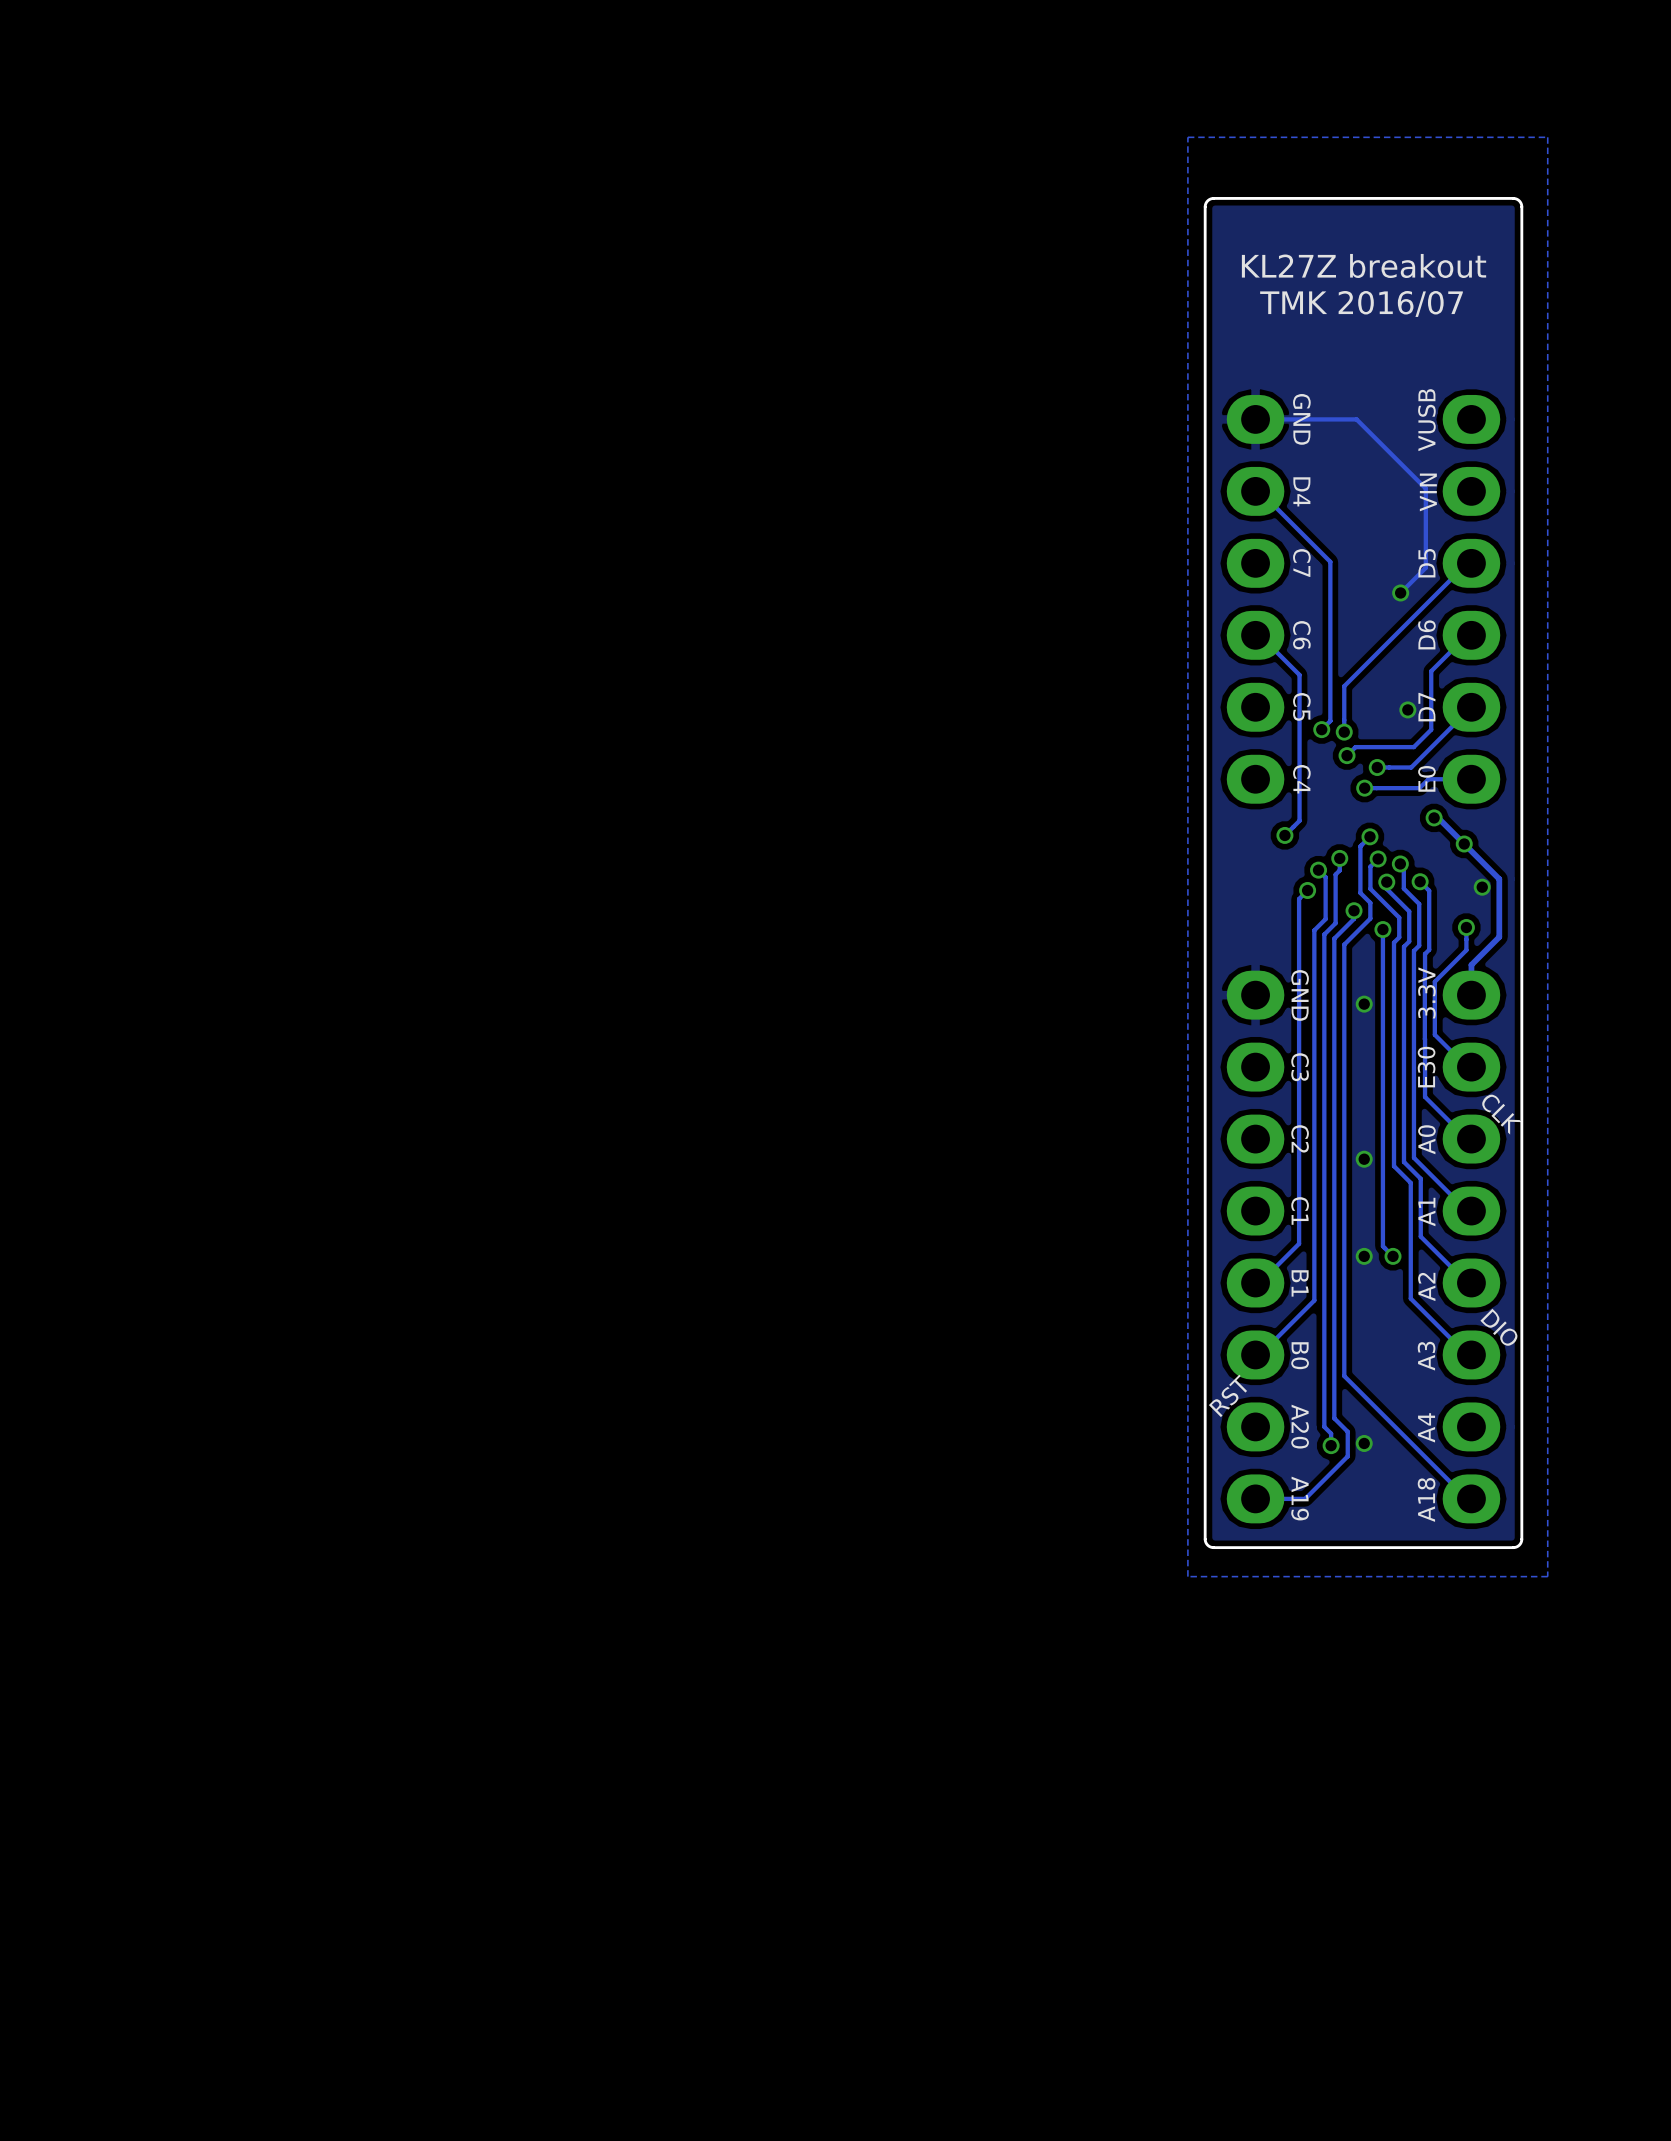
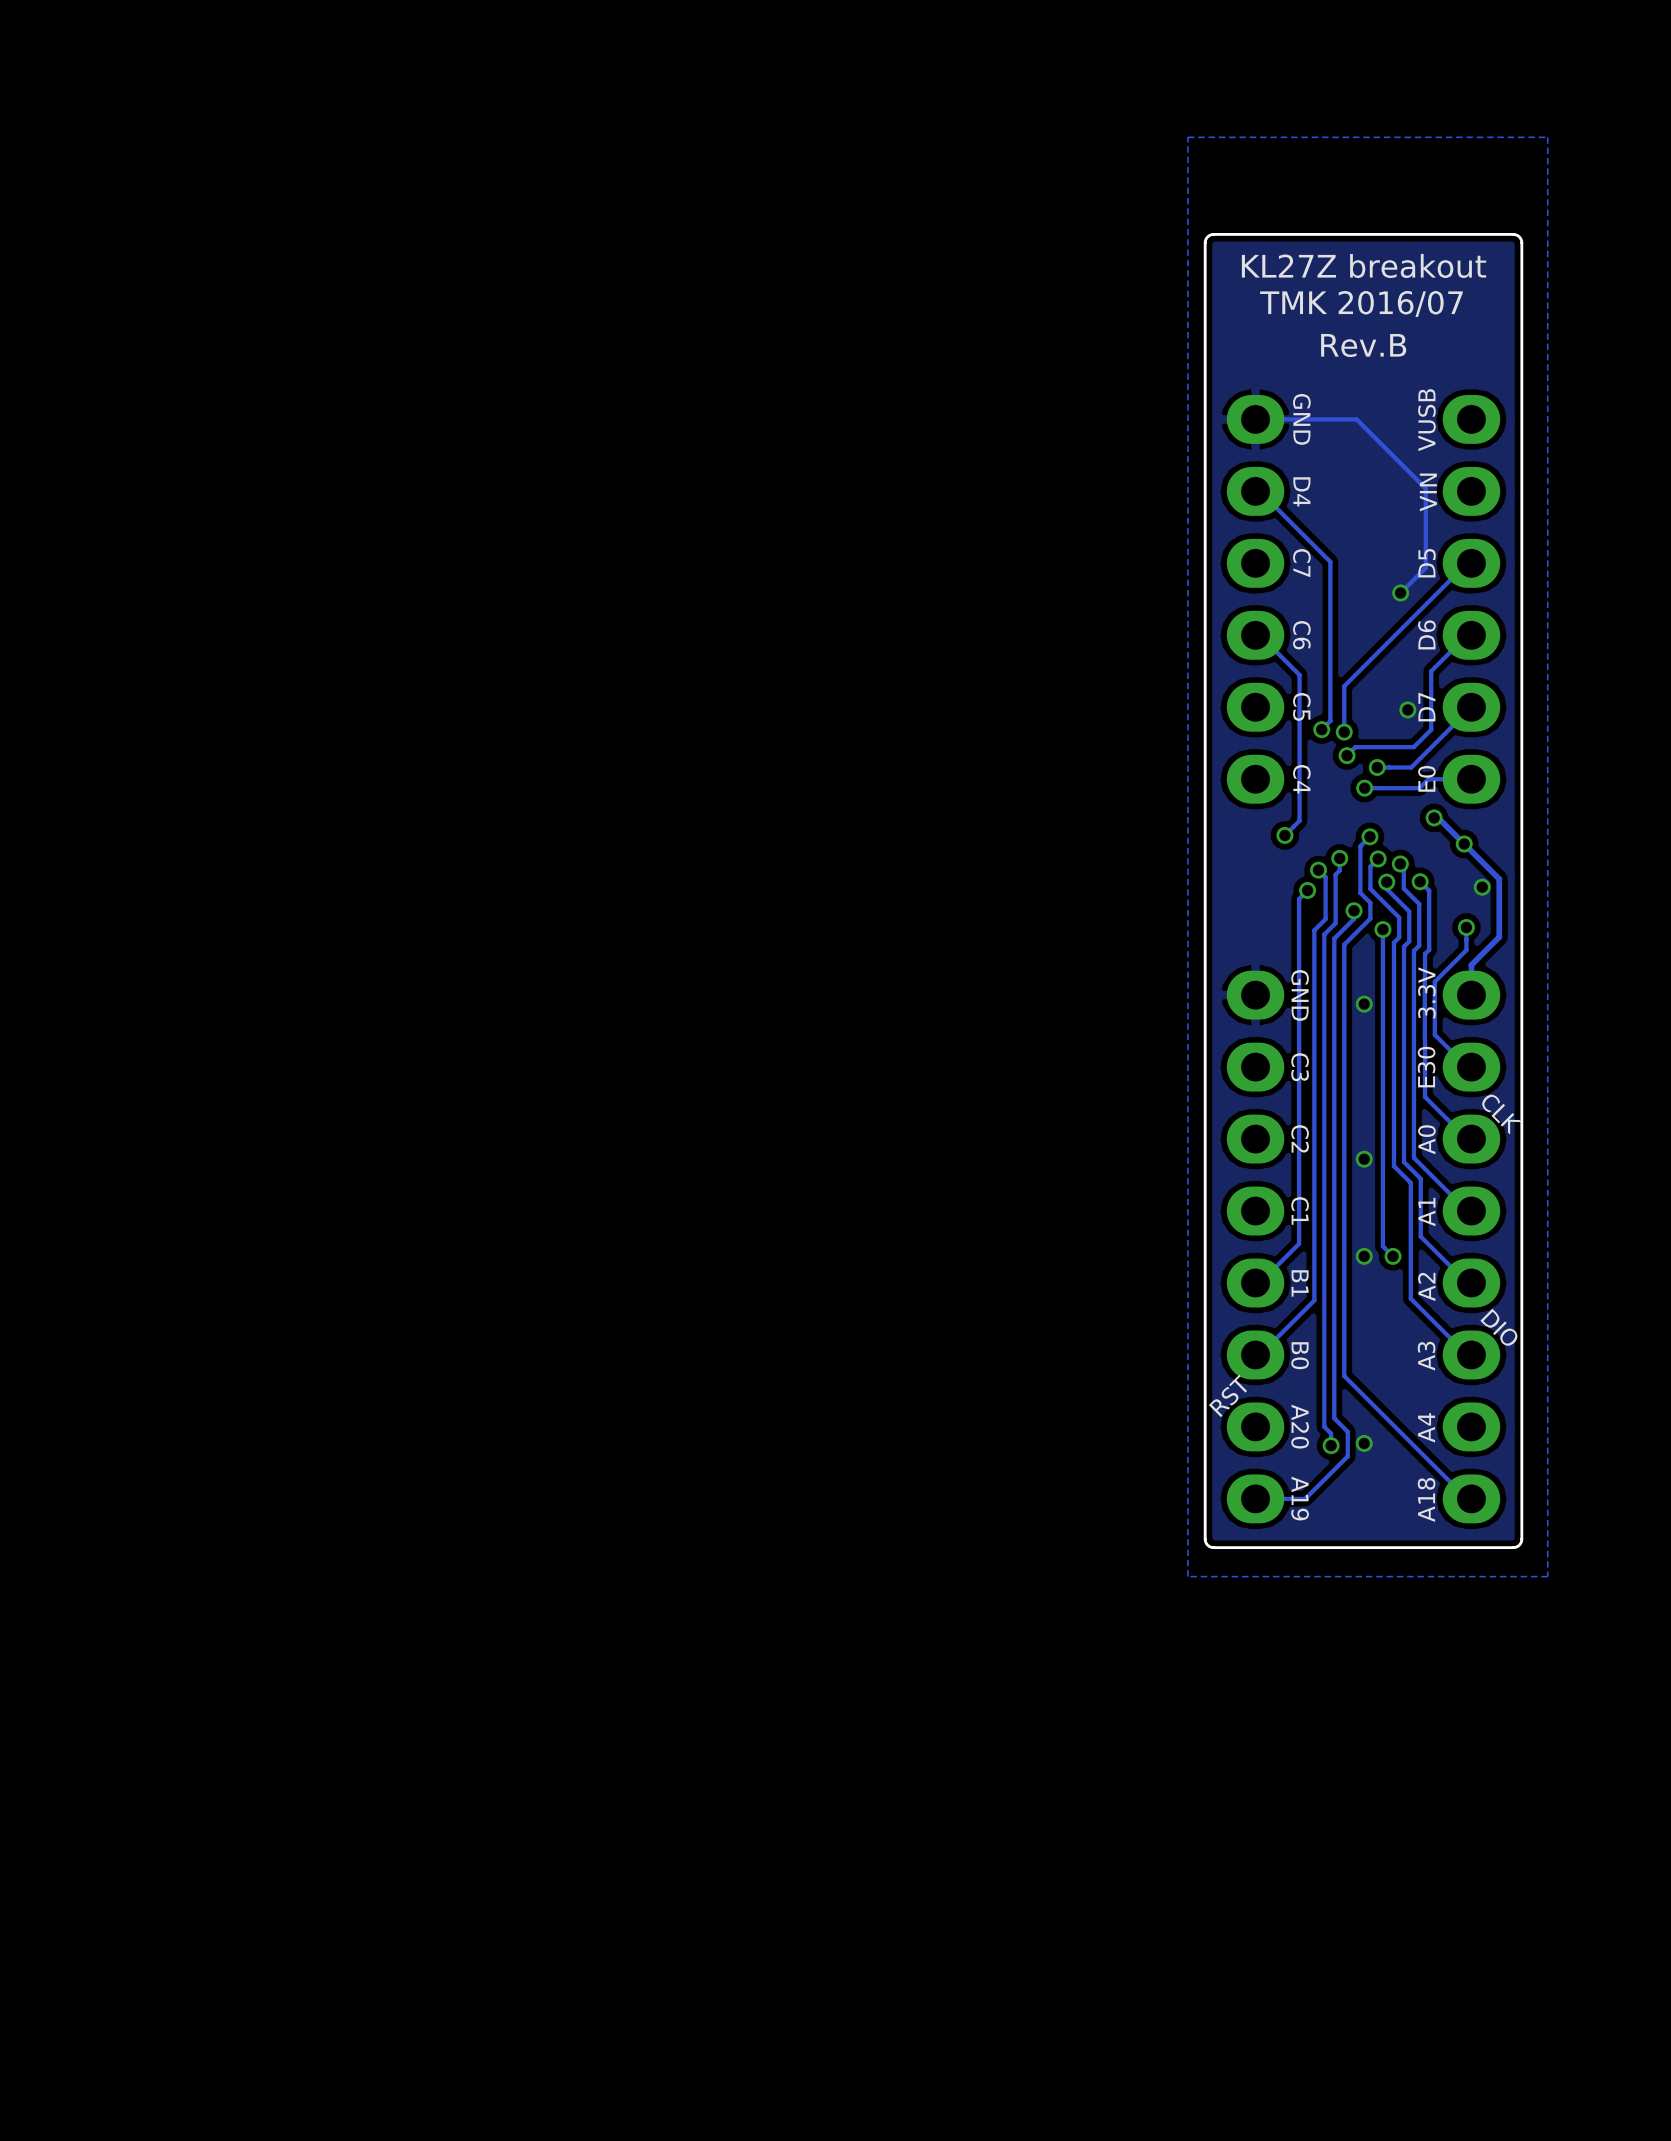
board edge: (1521, 242) (1521, 205) (1519, 200) (1513, 198) (1212, 198) (1207, 200) (1205, 205) (1205, 242) -> (1521, 242) (1519, 236) (1513, 234) (1213, 234) (1207, 236) (1205, 242)
text: none -> Rev.B (1363, 345)

